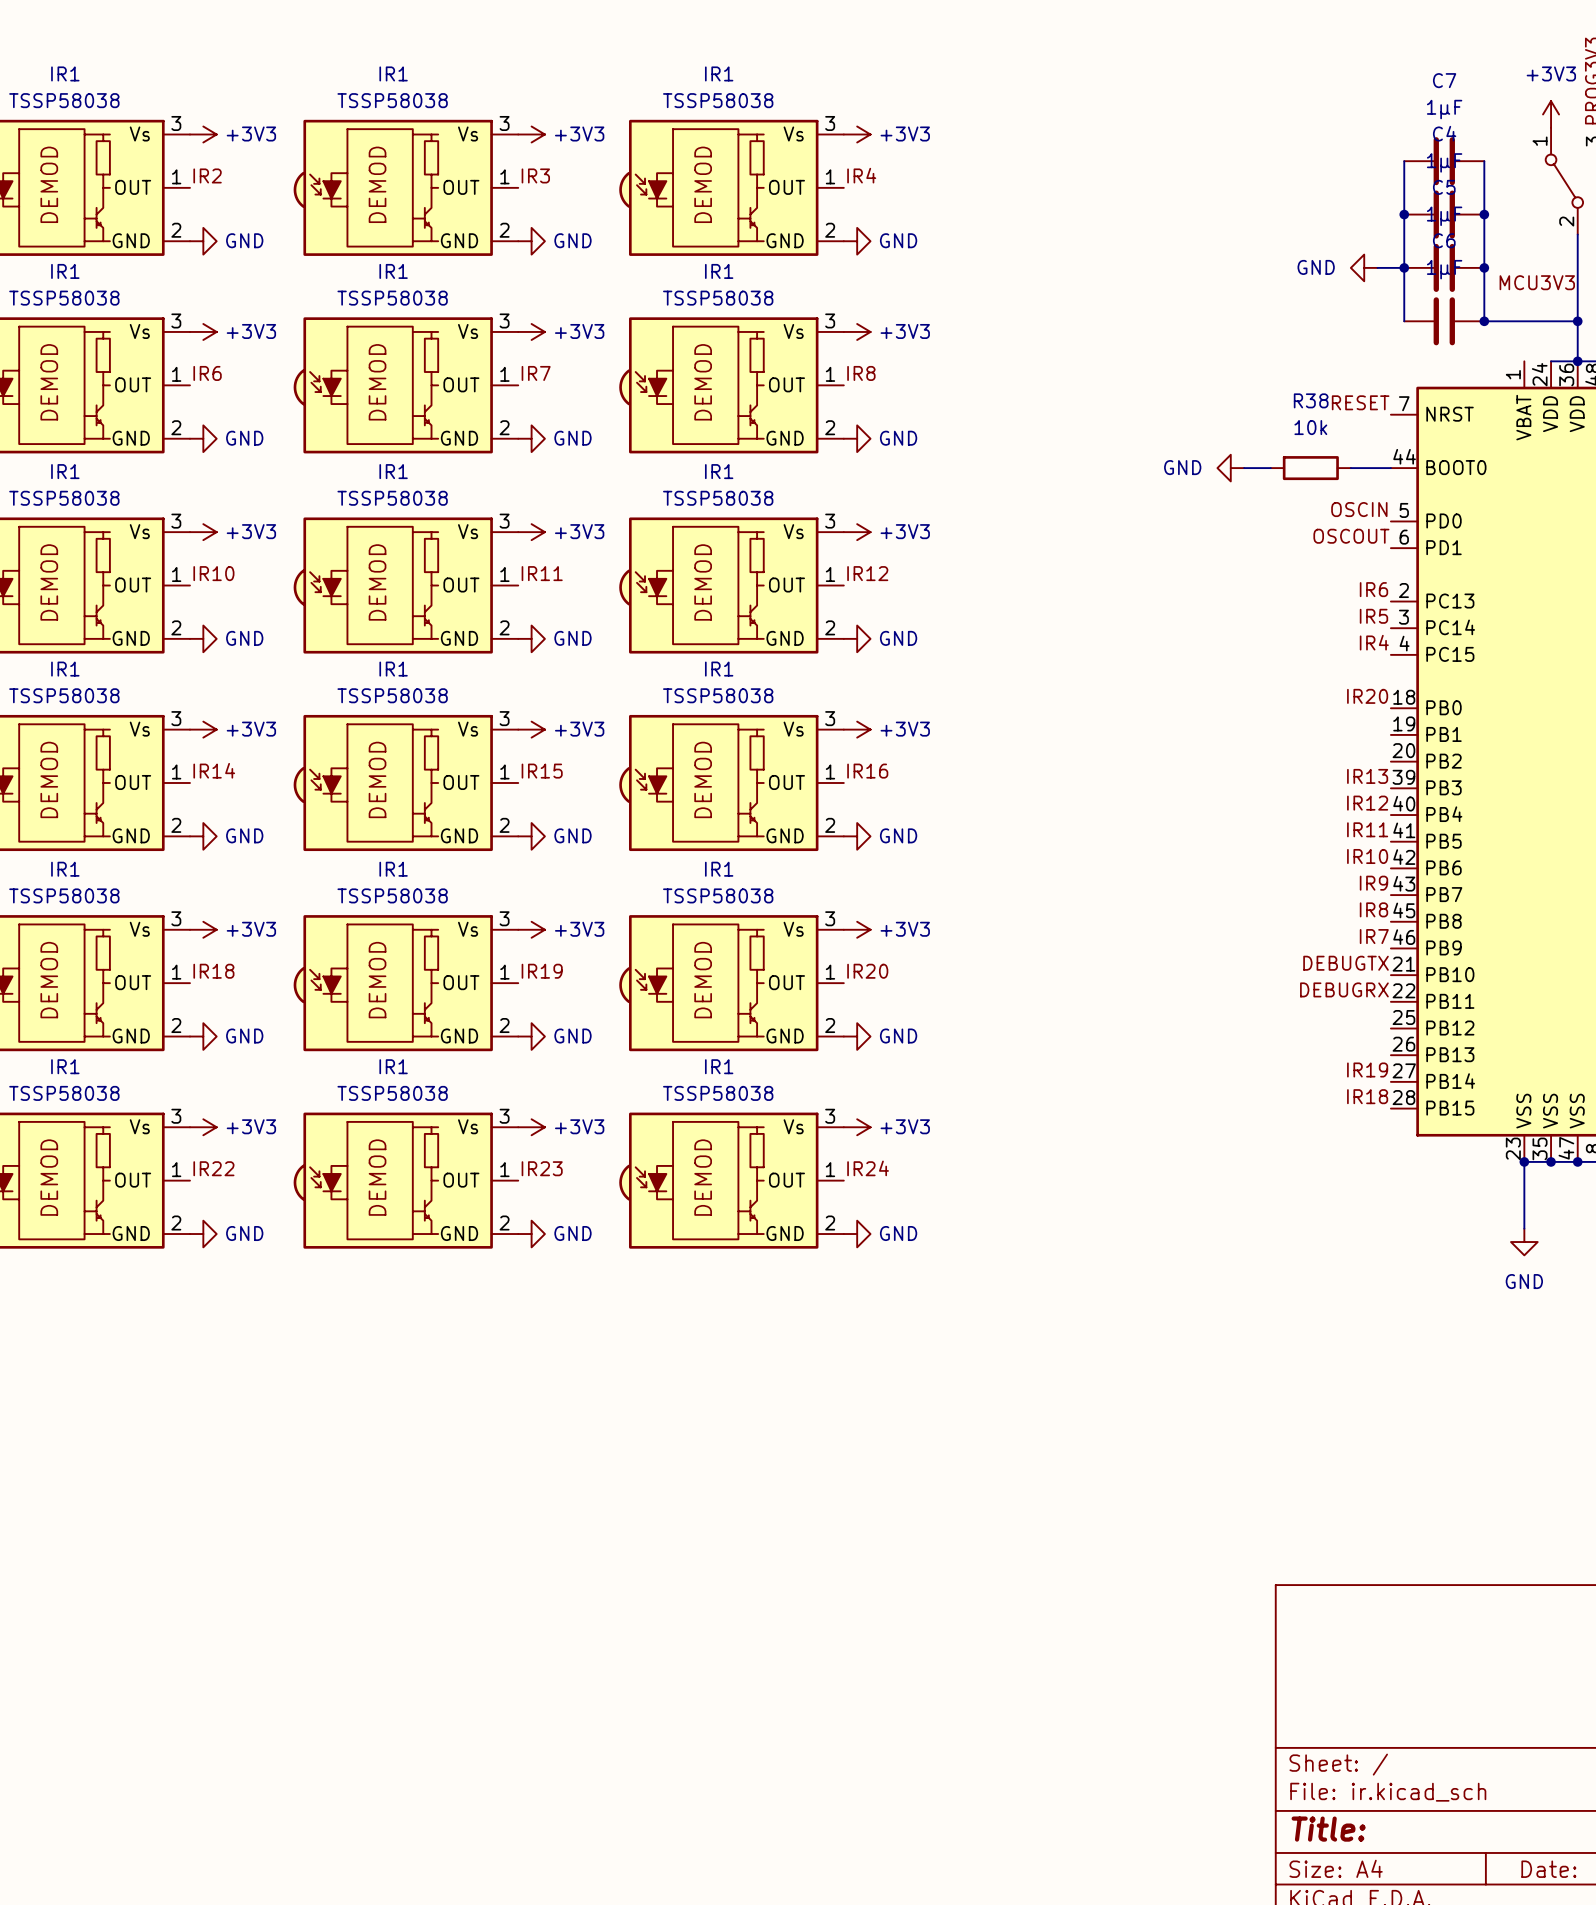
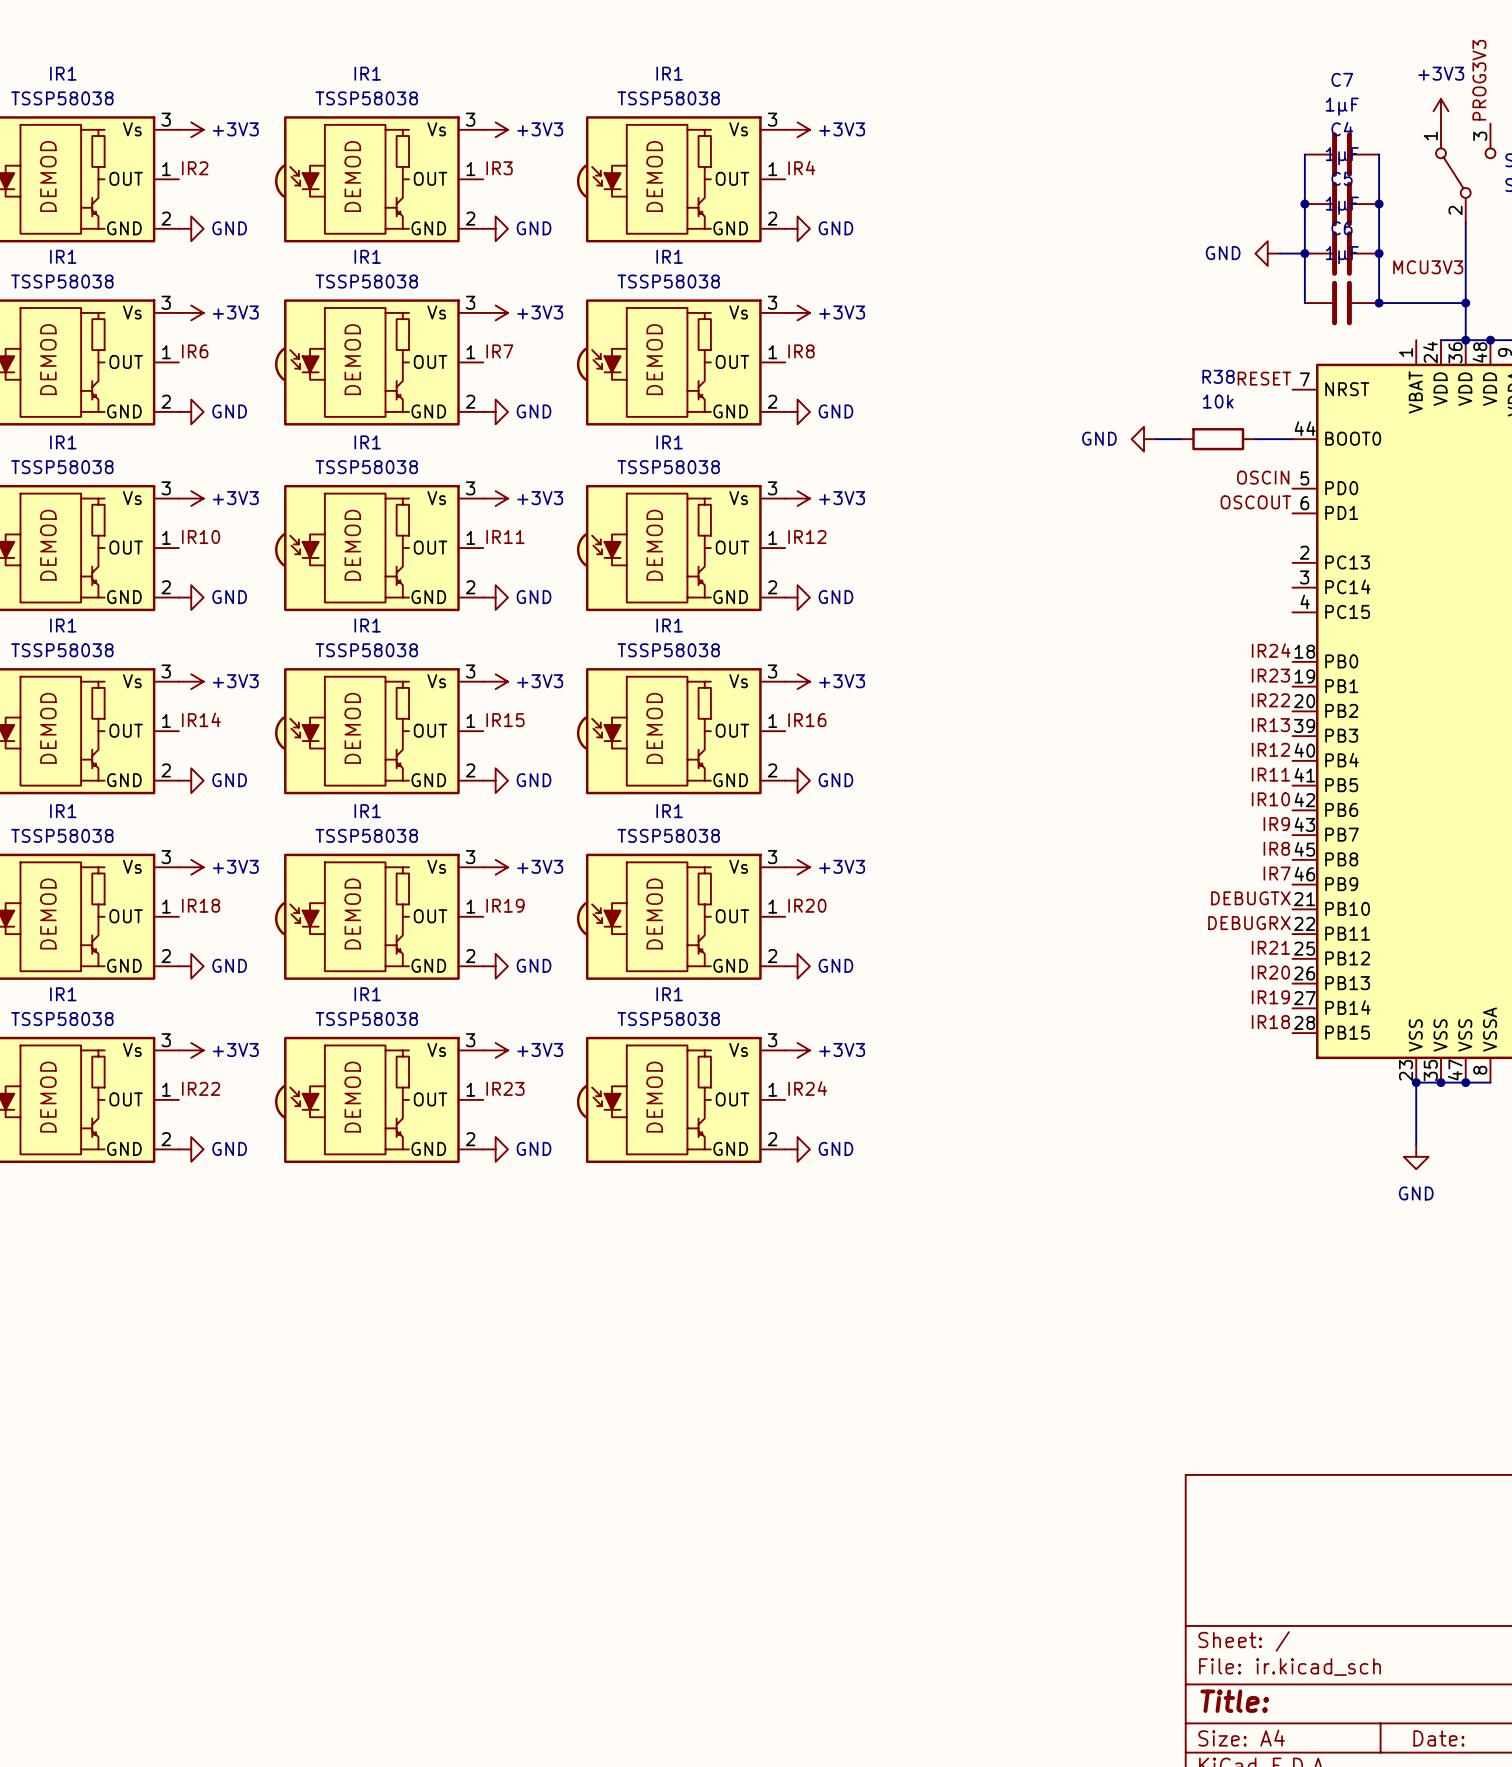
label: IR6 (1373, 589) -> none
label: IR5 (1373, 616) -> none
label: IR4 (1374, 642) -> none
label: IR20 (1367, 696) -> IR24 (1271, 650)
label: none -> IR23 (1270, 675)
label: none -> IR22 (1270, 700)
label: none -> IR21 (1270, 947)
label: none -> IR20 (1270, 972)

